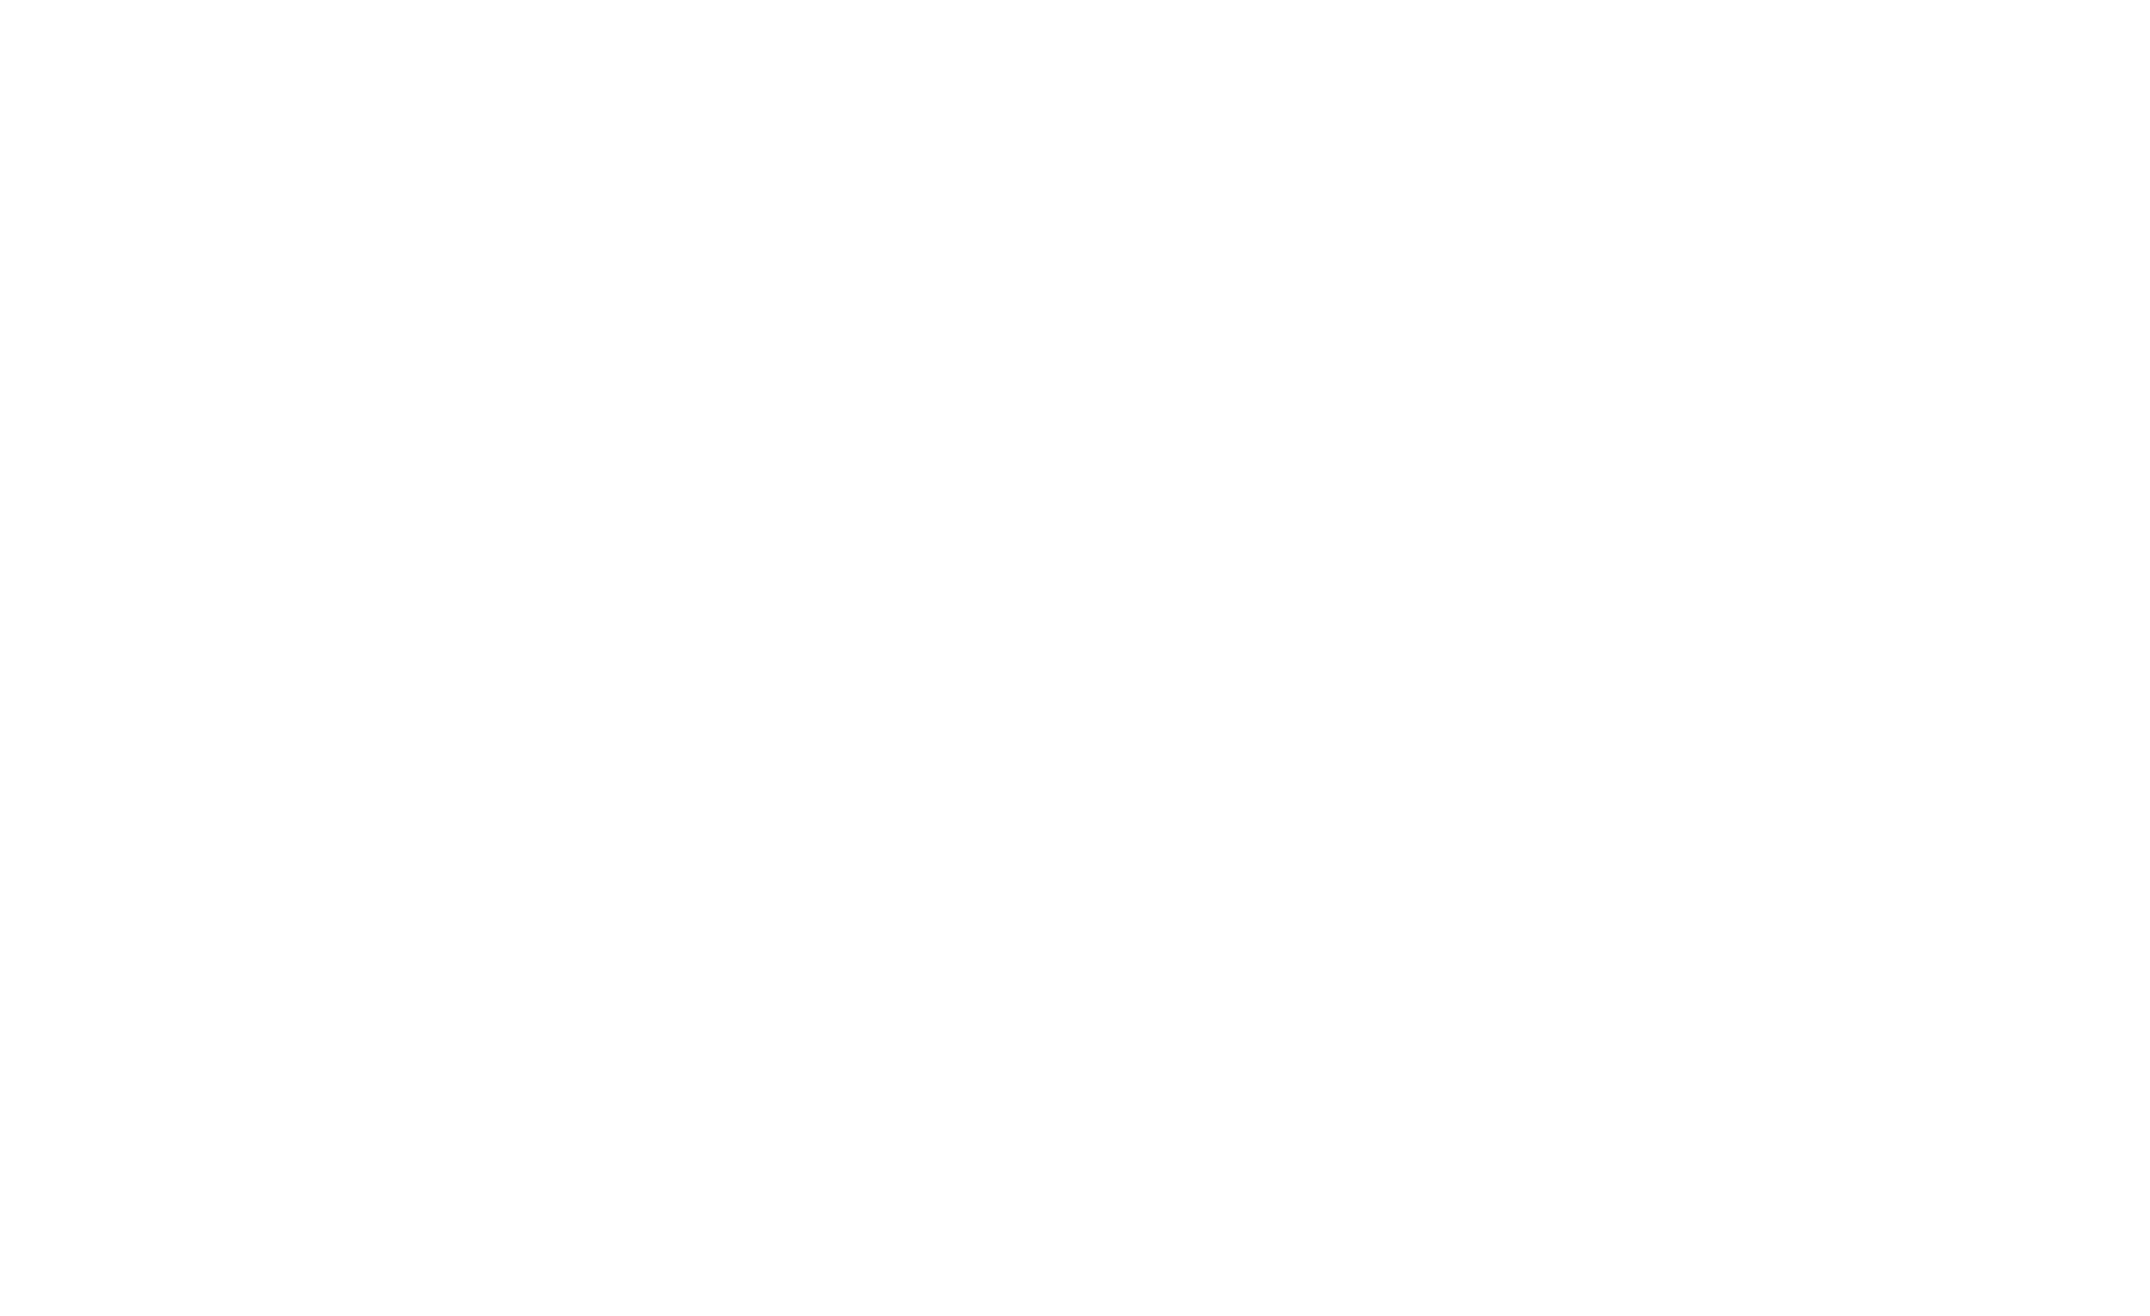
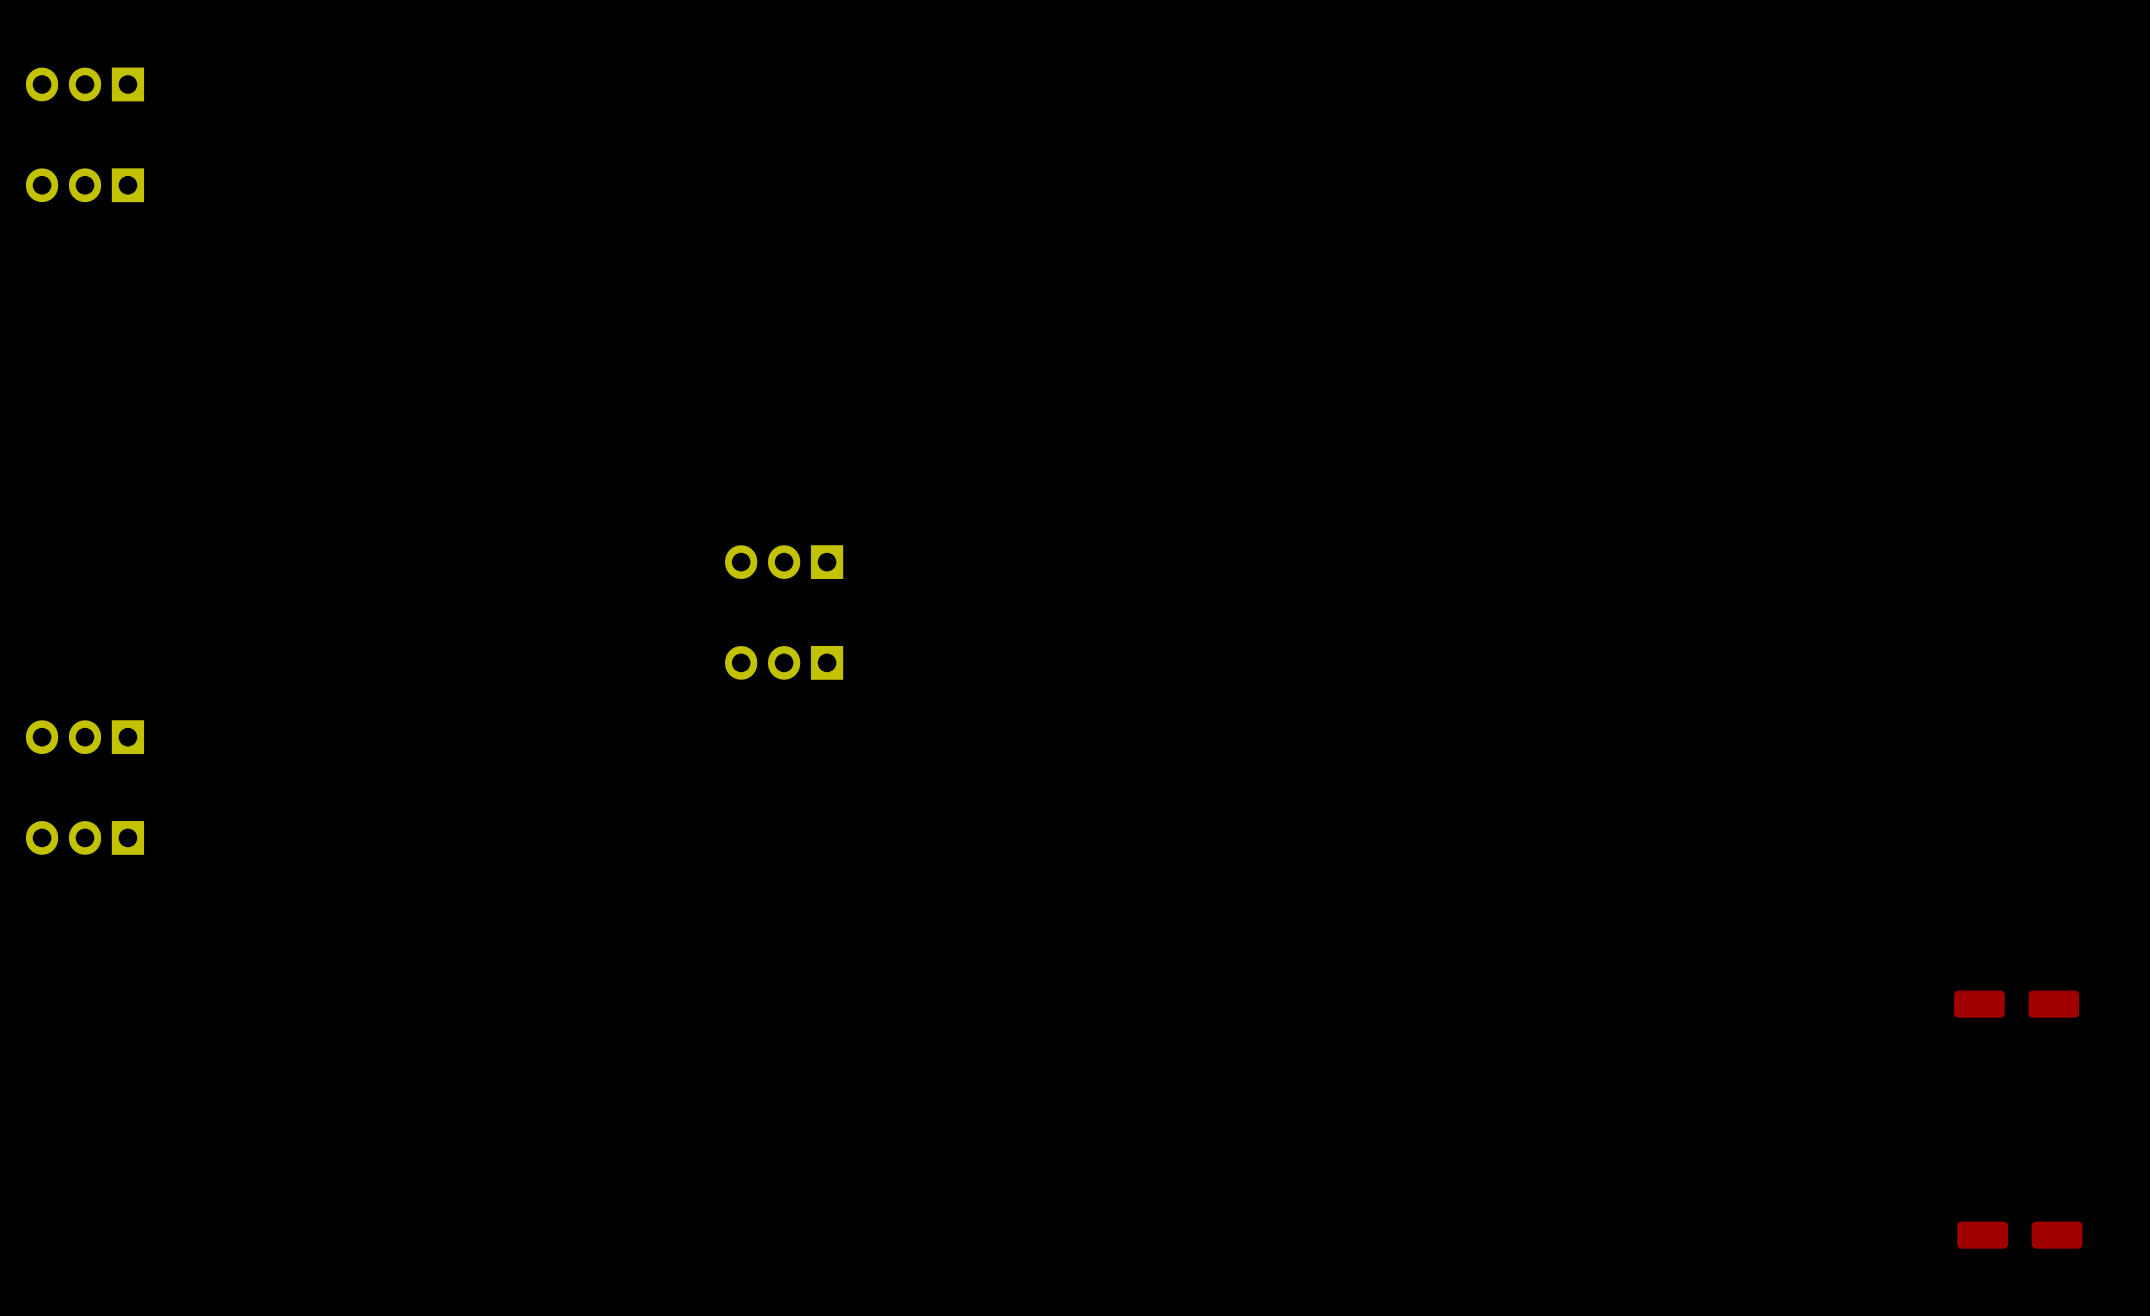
part: none -> (85, 84)
part: none -> (85, 185)
part: none -> (784, 562)
part: none -> (784, 662)
part: none -> (85, 737)
part: none -> (85, 837)
part: none -> (2016, 1004)
part: none -> (2019, 1235)

